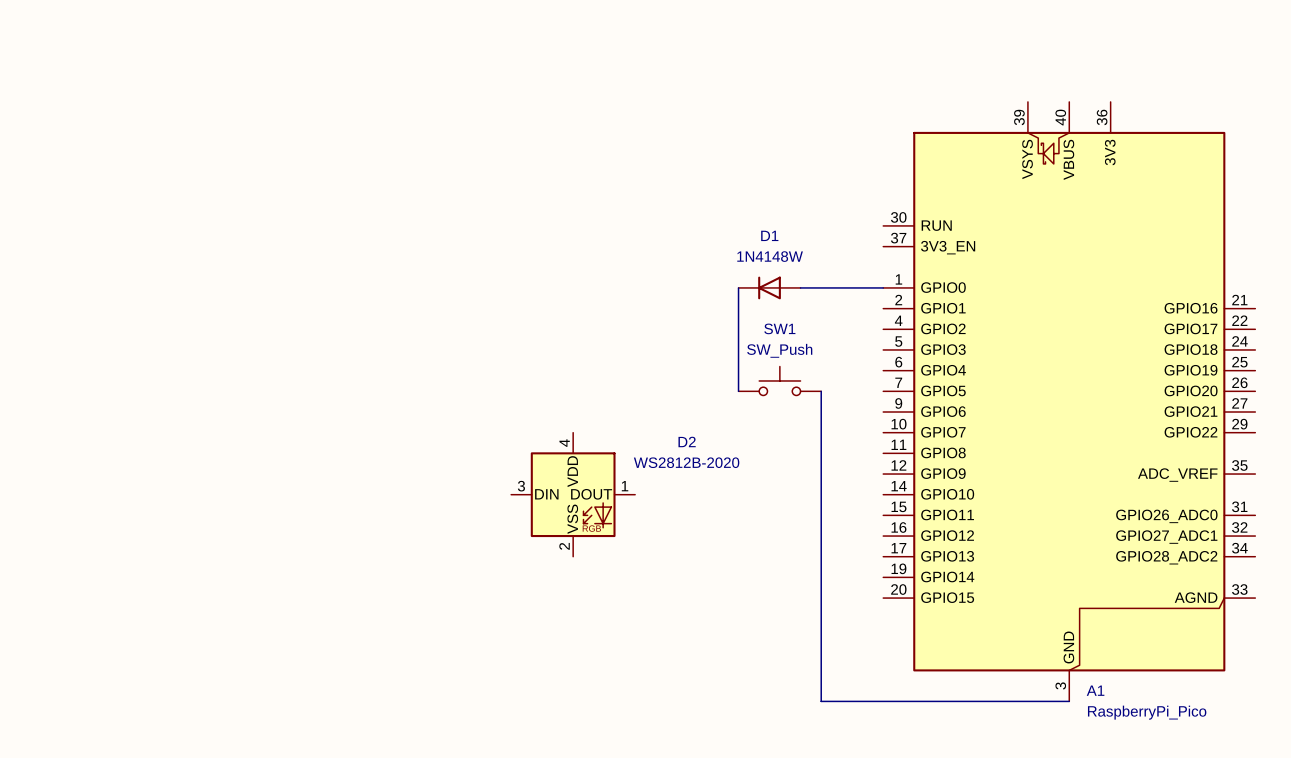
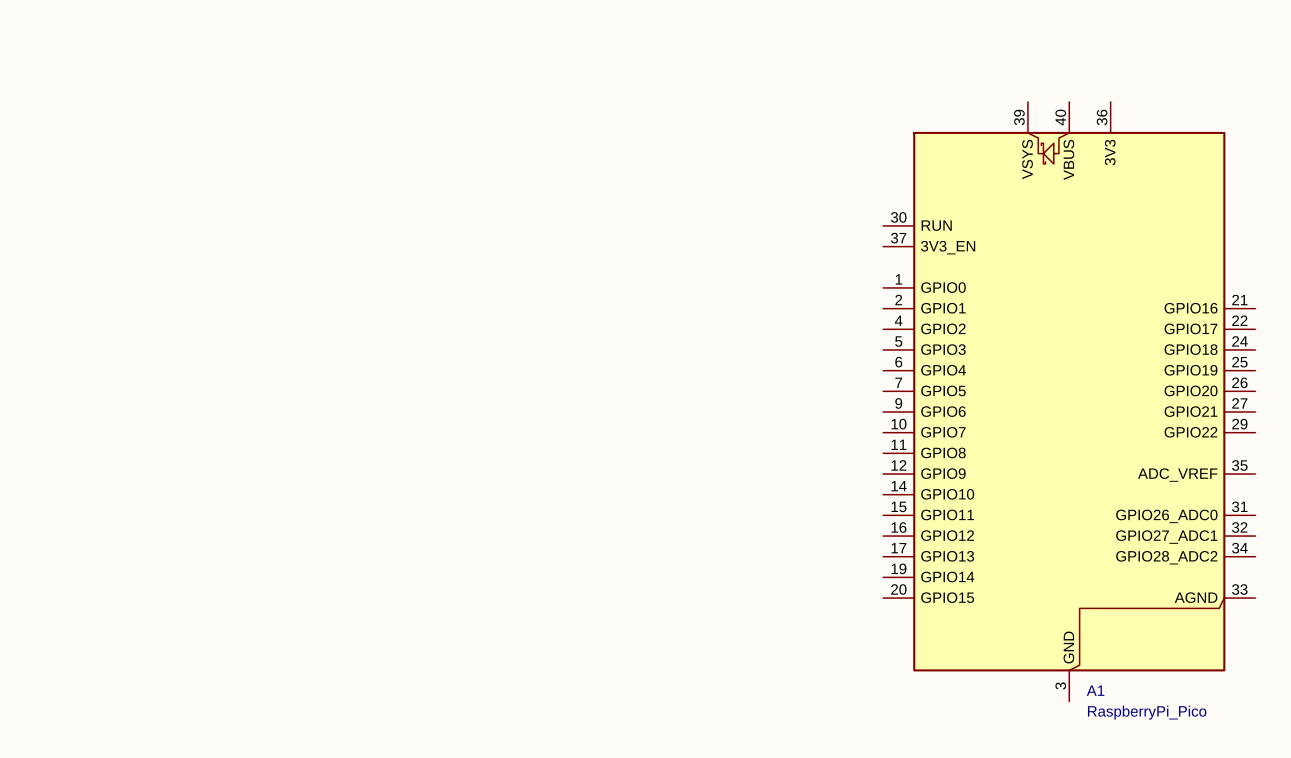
wire: (738, 287) (738, 391) -> none
D1: 1N4148W (769, 287) -> none
wire: (800, 287) (883, 287) -> none
SW1: SW_Push (779, 380) -> none
wire: (821, 391) (821, 701) (1069, 701) -> none
D2: WS2812B-2020 (573, 494) -> none

